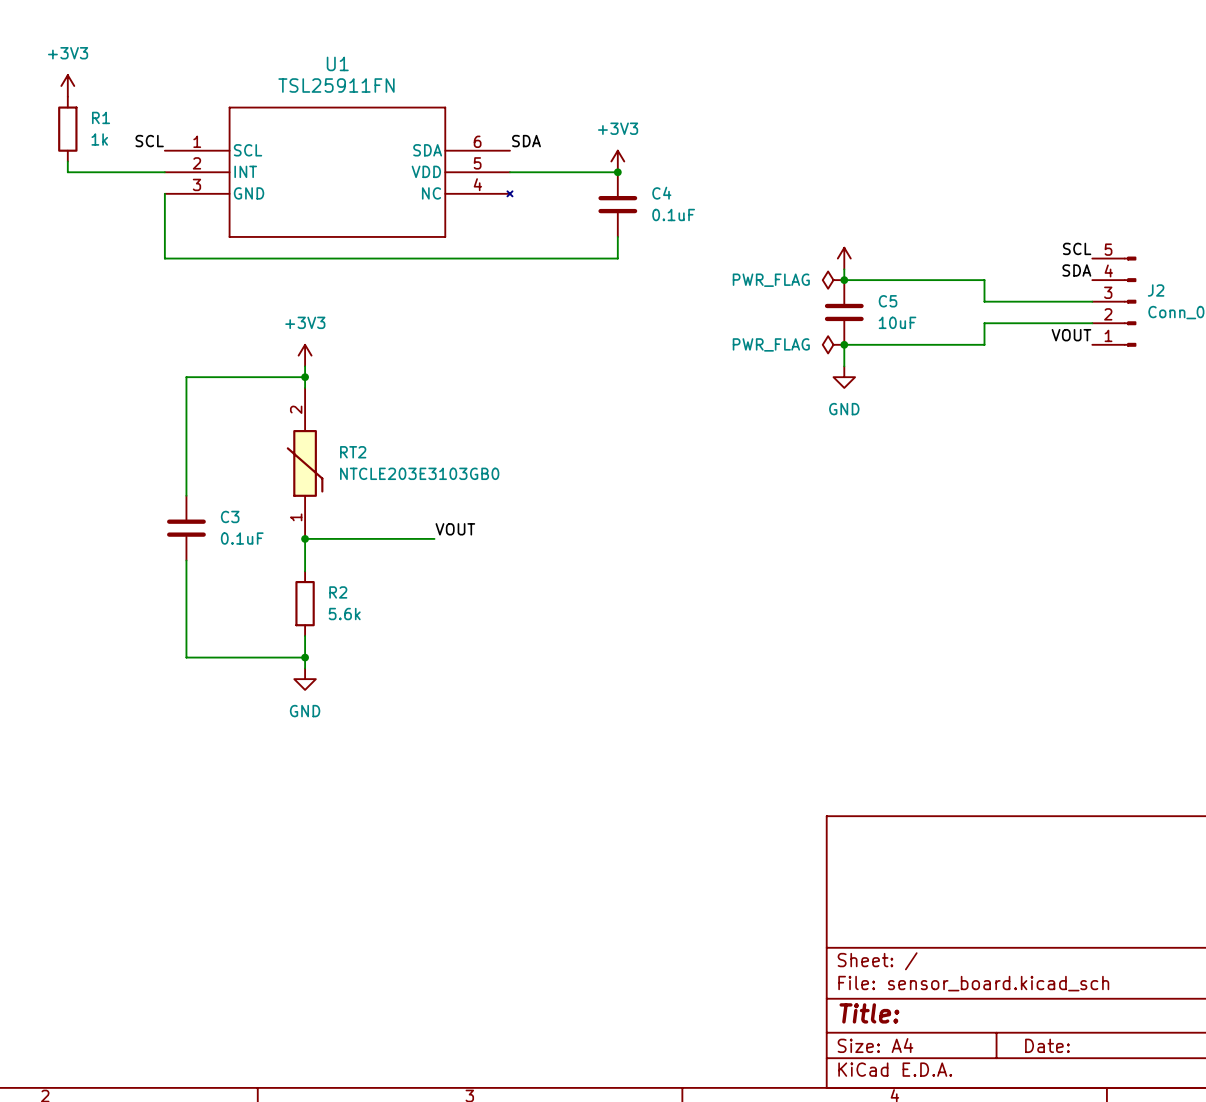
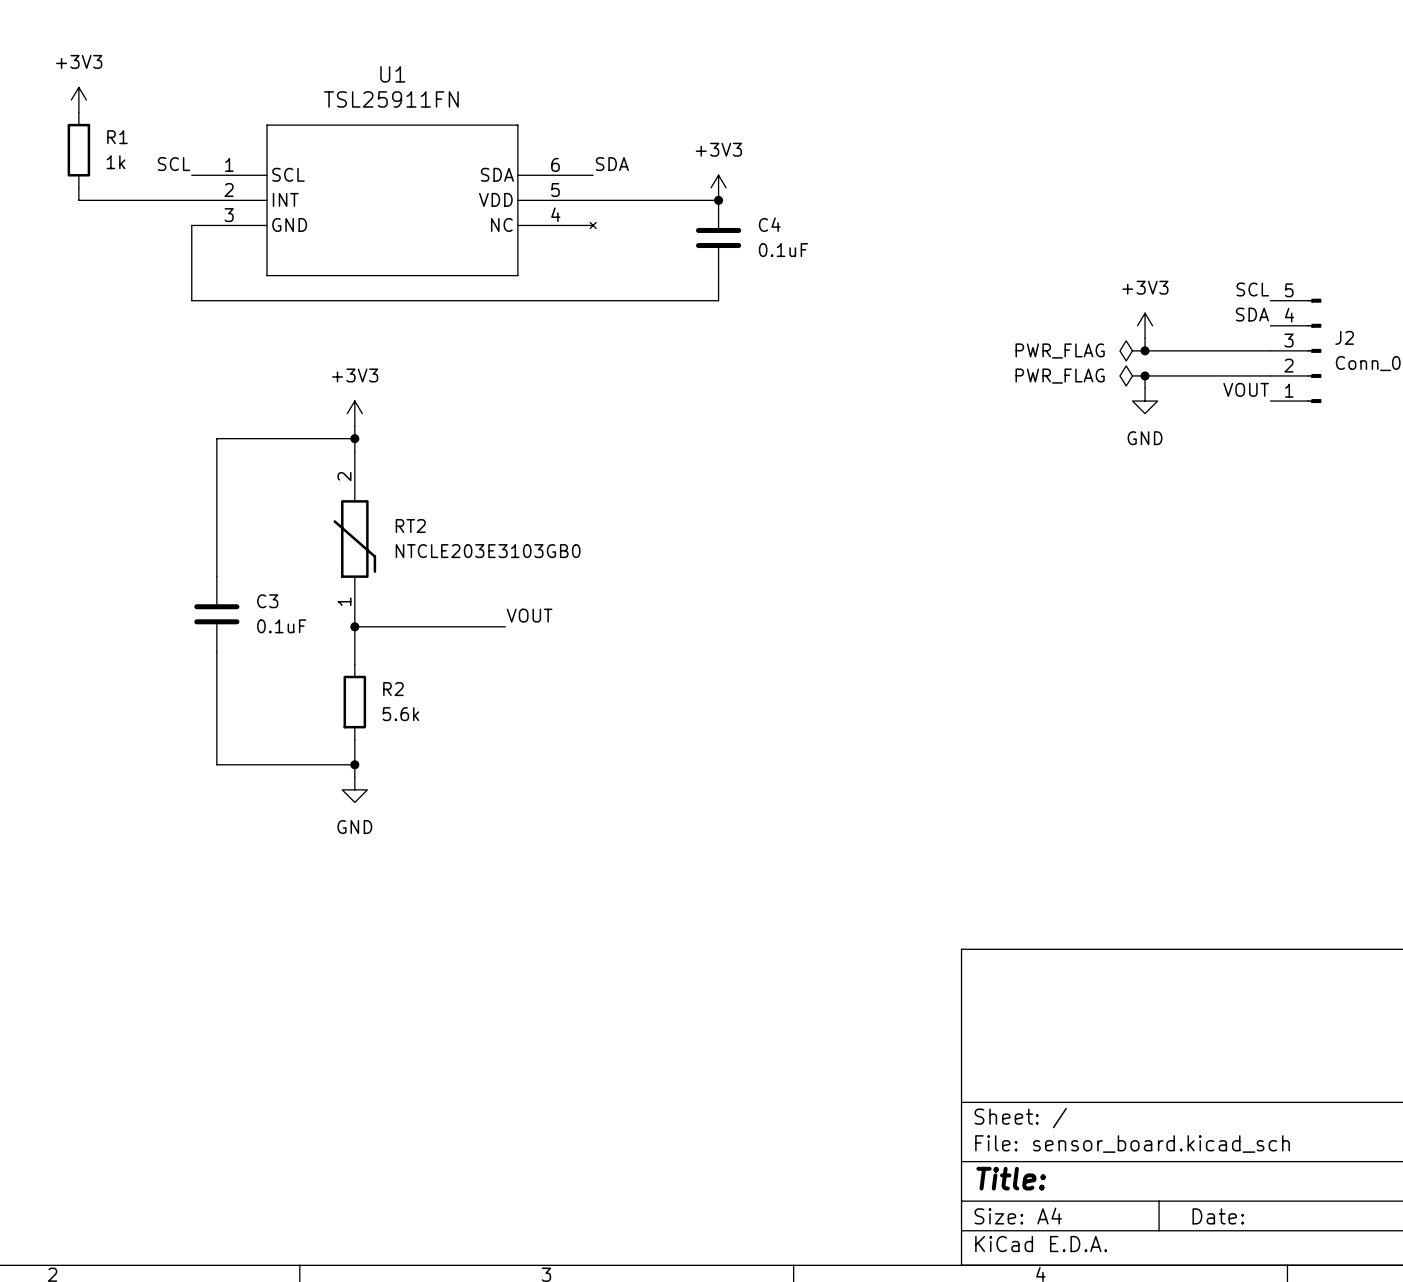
power symbol: (844, 258) -> none
wire: (844, 269) (844, 280) (984, 280) (984, 290) -> none
power symbol: PWR_FLAG (833, 280) -> none
junction: (844, 280) -> none
power symbol: none -> +3V3 (1145, 325)
power symbol: none -> PWR_FLAG (1132, 350)
junction: none -> (1145, 350)
C5: 10uF (844, 312) -> none
power symbol: none -> PWR_FLAG (1132, 375)
junction: none -> (1145, 375)
wire: (984, 334) (984, 344) (844, 344) (844, 366) -> none
power symbol: PWR_FLAG (833, 344) -> none
junction: (844, 344) -> none
power symbol position: GND (844, 377) -> GND (1145, 401)

